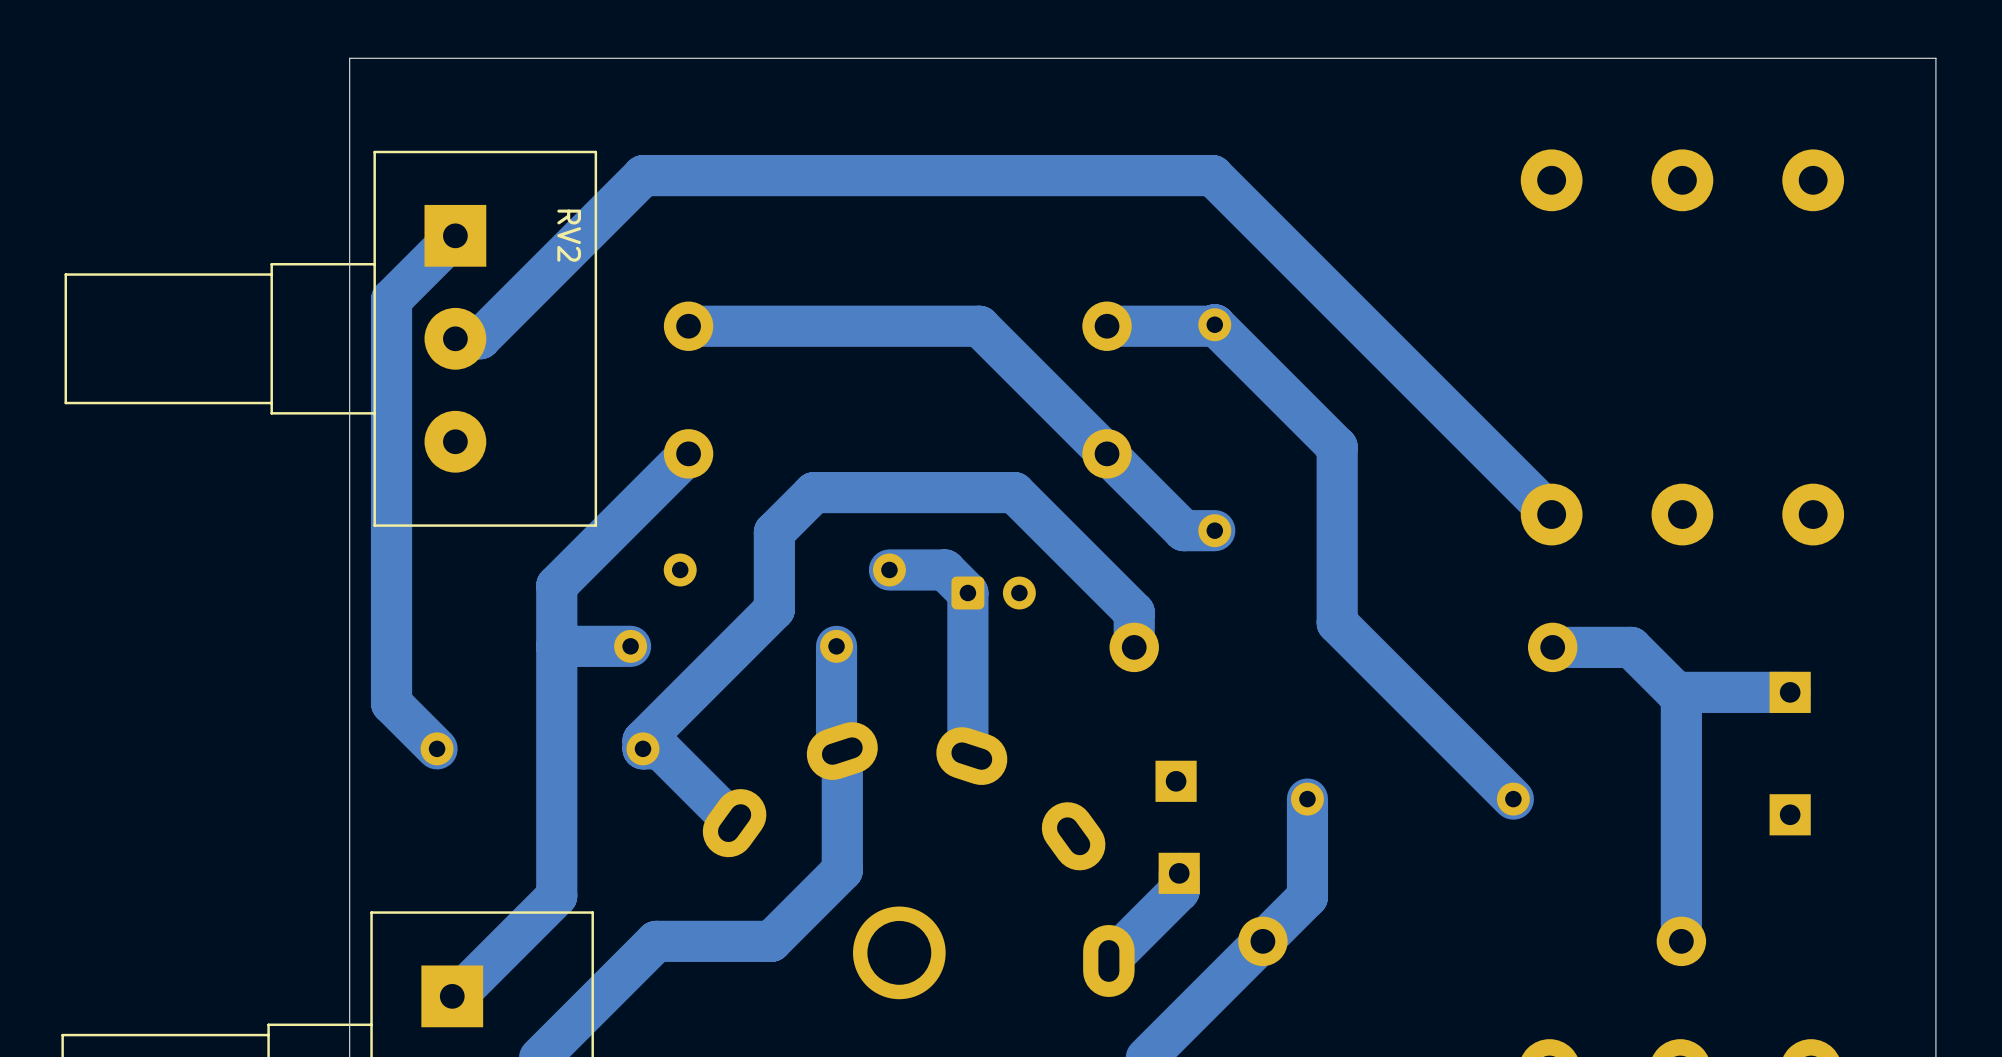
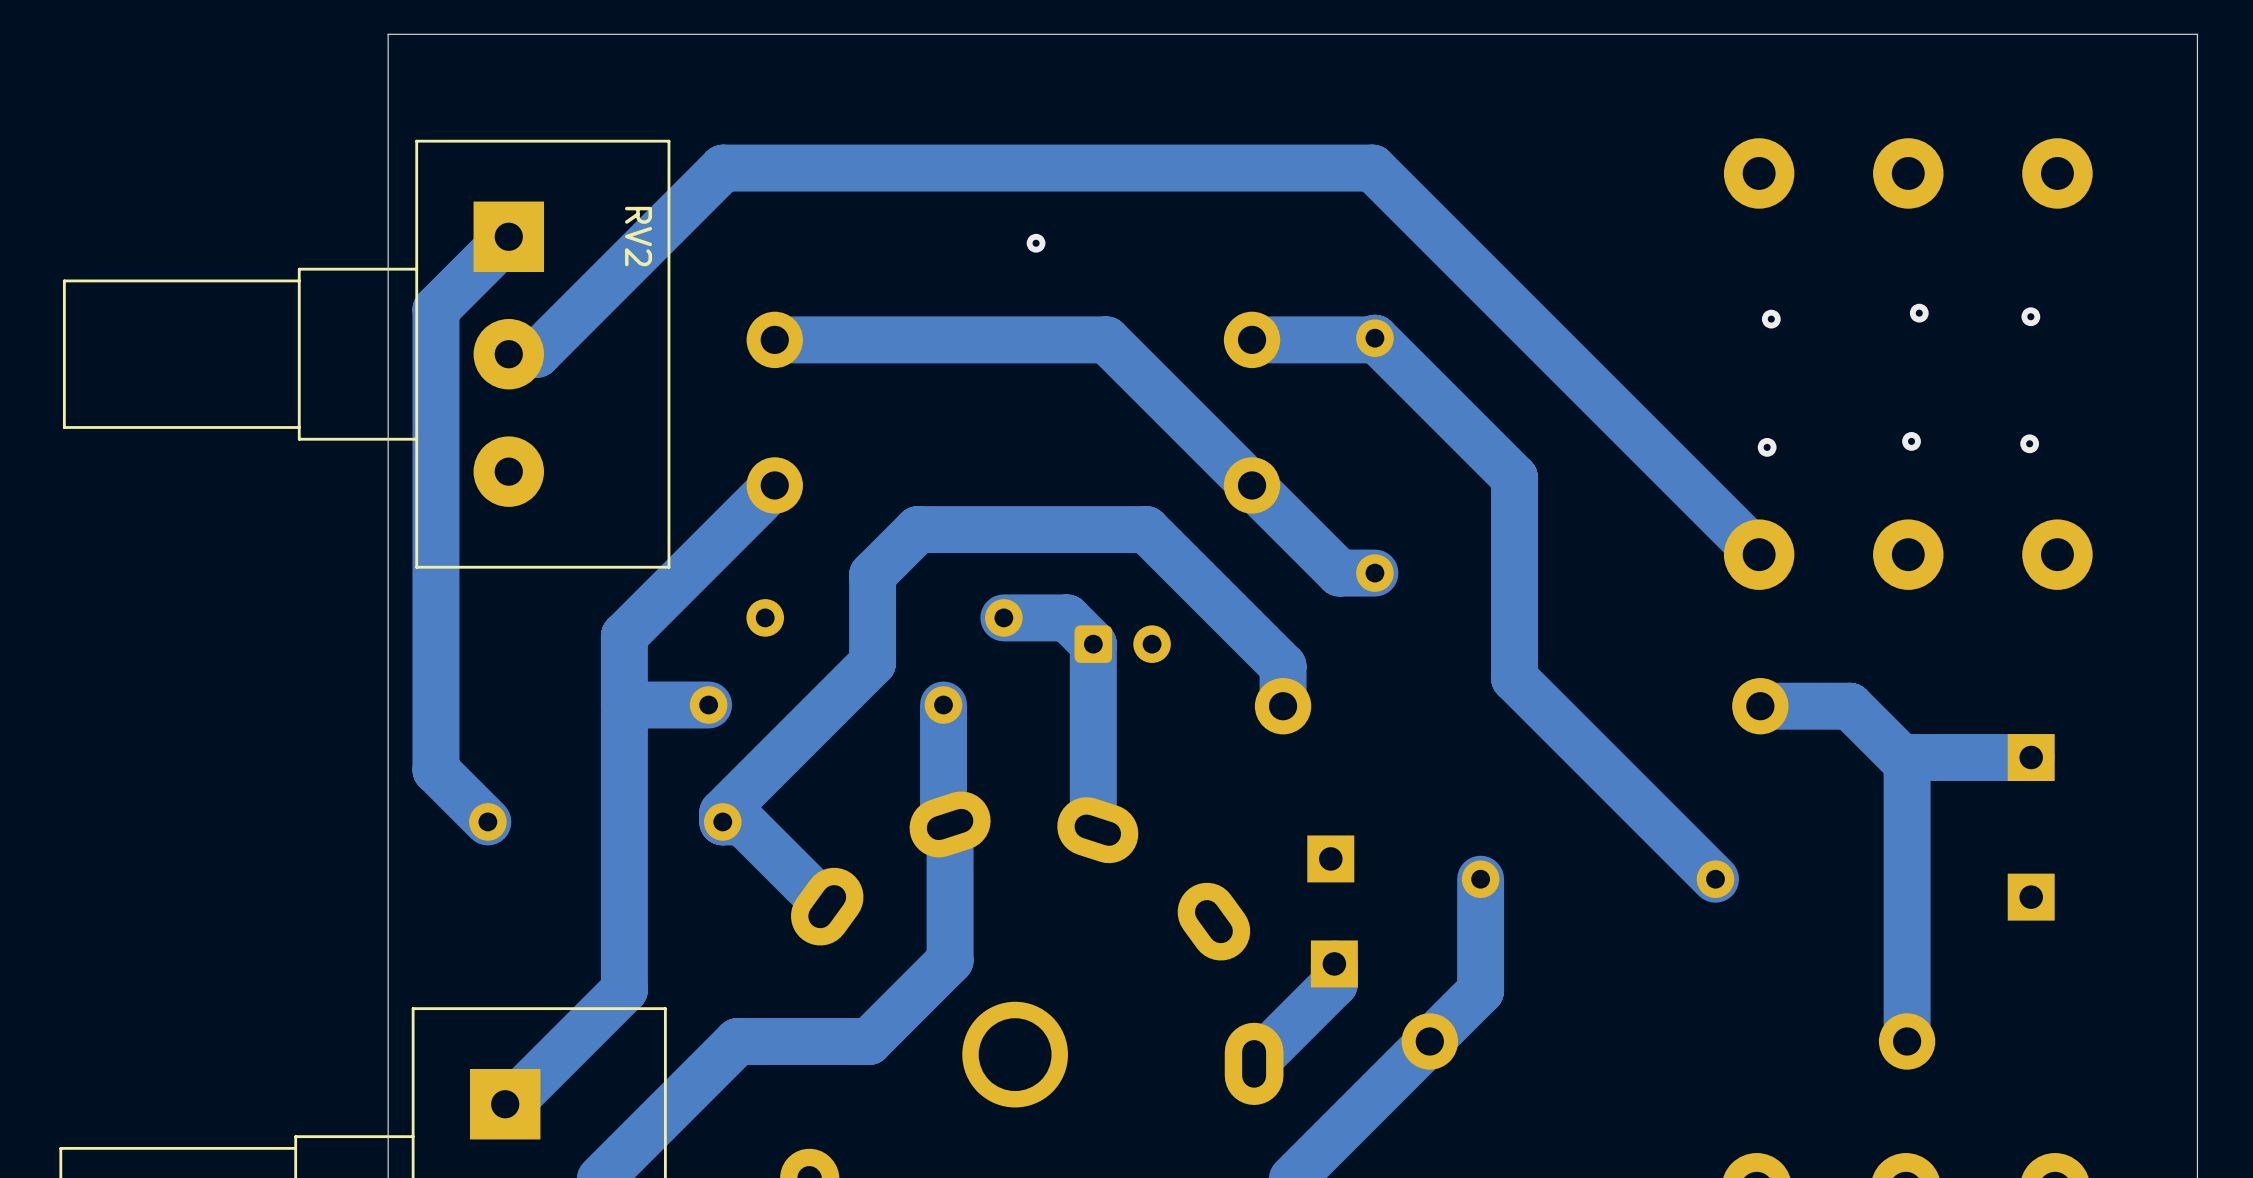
via: none -> (1036, 243)
via: none -> (1919, 313)
via: none -> (2030, 316)
via: none -> (1771, 319)
via: none -> (1911, 441)
via: none -> (2029, 443)
via: none -> (1767, 447)

